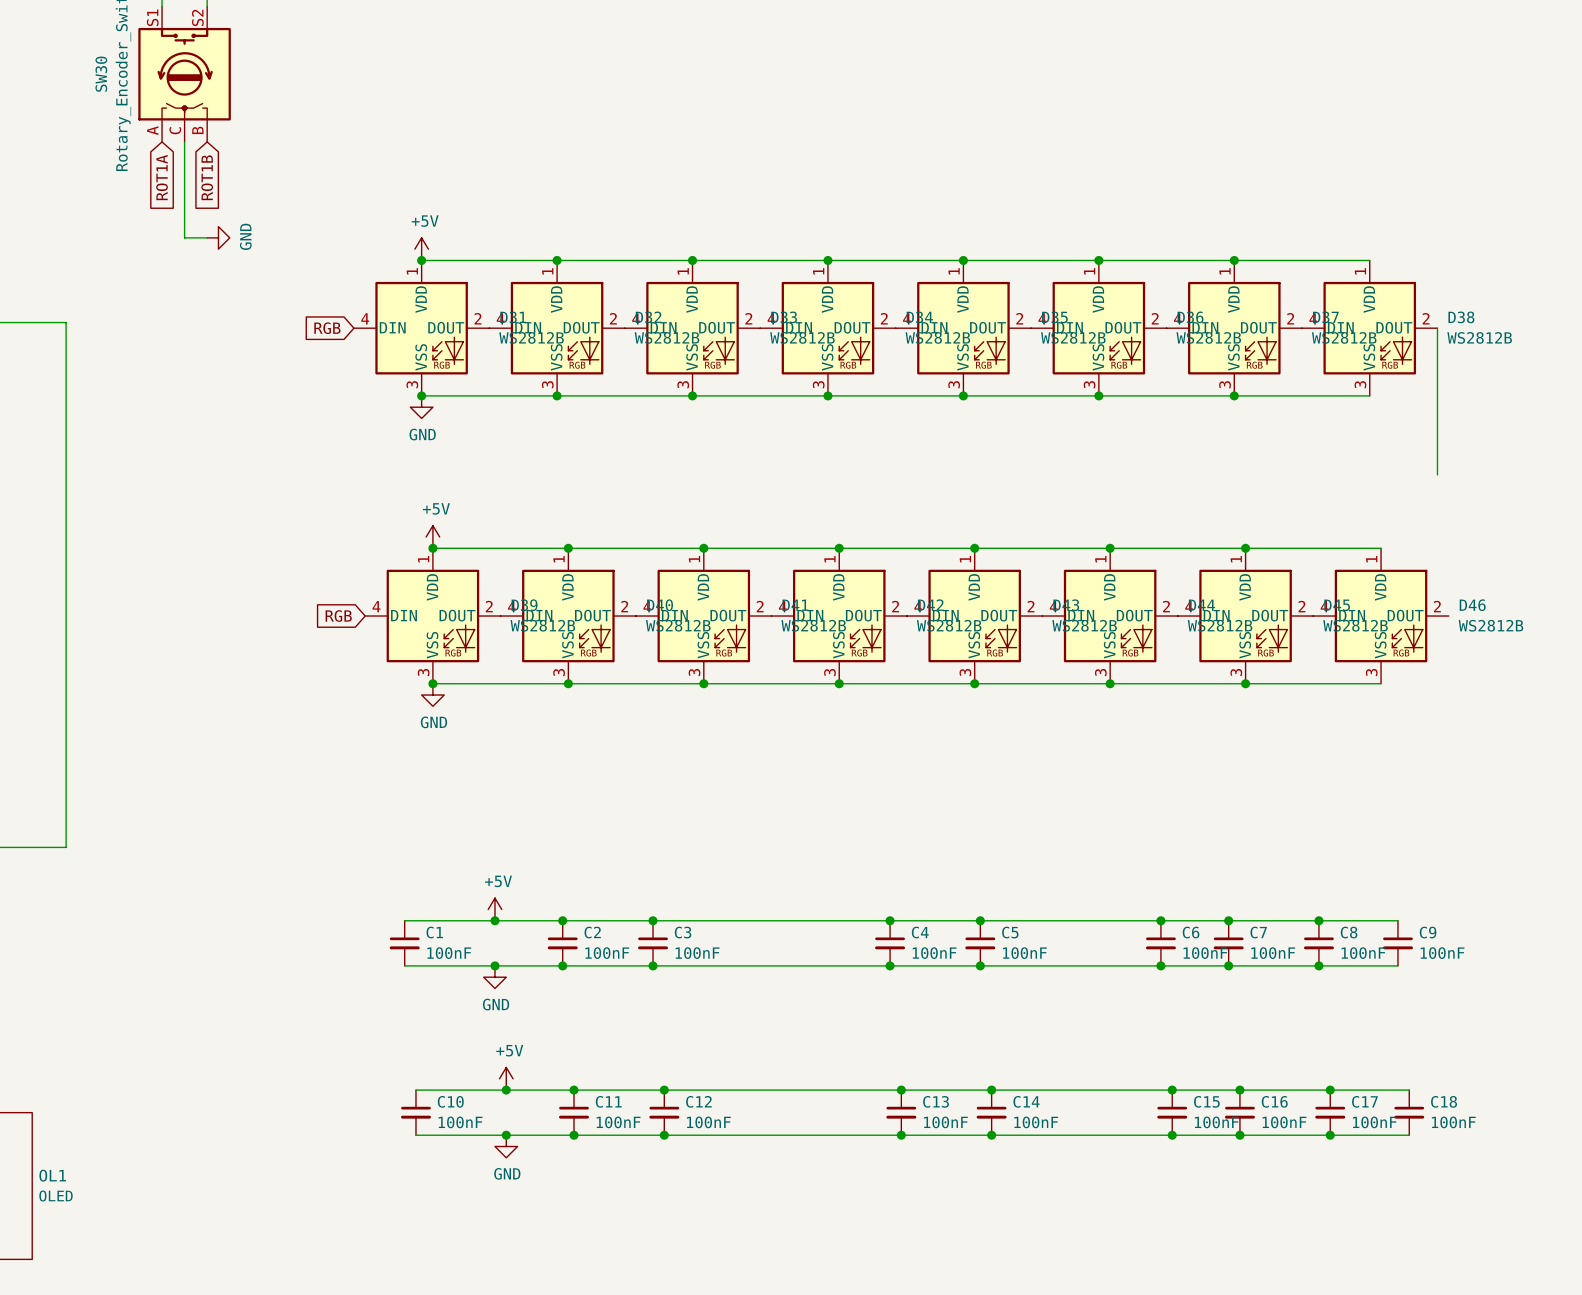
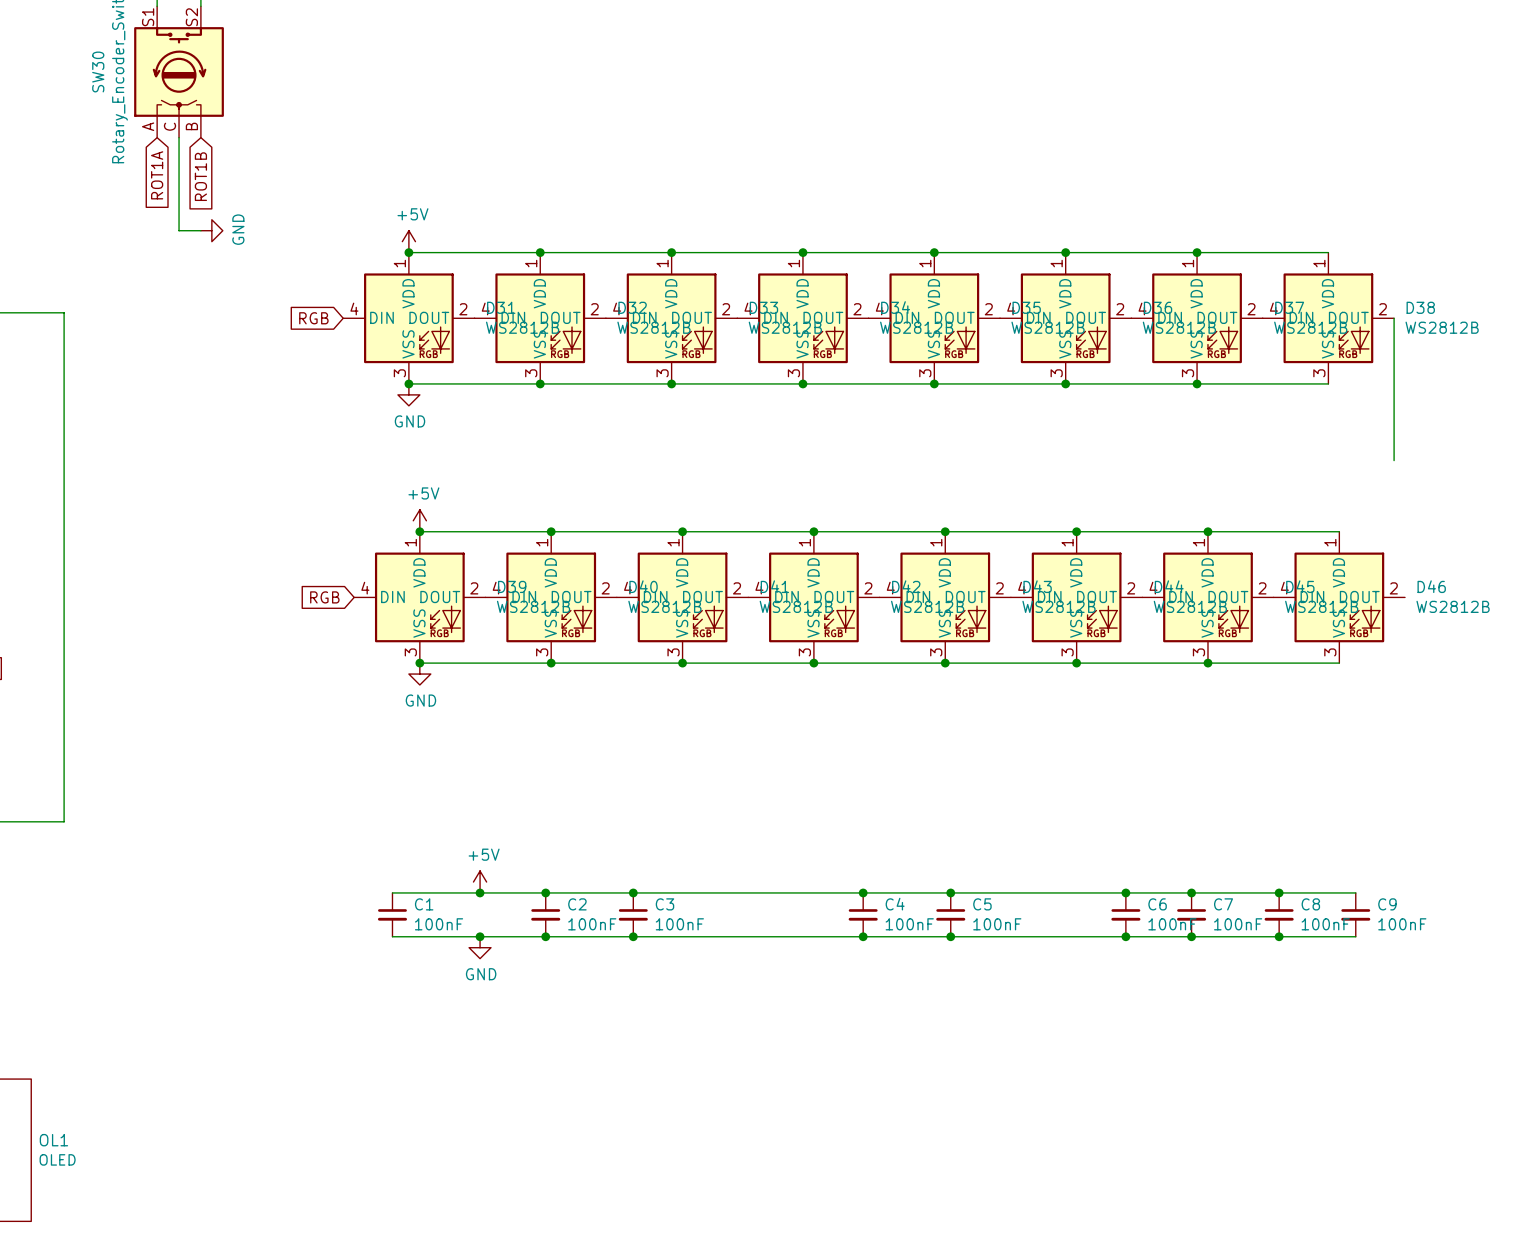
power symbol: +5V (506, 1078) -> none
wire: (415, 1090) (1409, 1090) -> none
junction: (506, 1090) -> none
junction: (574, 1090) -> none
junction: (664, 1090) -> none
junction: (901, 1090) -> none
junction: (991, 1090) -> none
junction: (1172, 1090) -> none
junction: (1239, 1090) -> none
junction: (1330, 1090) -> none
C10: 100nF (415, 1112) -> none
C11: 100nF (574, 1112) -> none
C12: 100nF (664, 1112) -> none
C13: 100nF (901, 1112) -> none
C14: 100nF (991, 1112) -> none
C15: 100nF (1172, 1112) -> none
C16: 100nF (1239, 1112) -> none
C17: 100nF (1330, 1112) -> none
C18: 100nF (1409, 1112) -> none
wire: (415, 1135) (1409, 1135) -> none
junction: (506, 1135) -> none
junction: (574, 1135) -> none
junction: (664, 1135) -> none
junction: (901, 1135) -> none
junction: (991, 1135) -> none
junction: (1172, 1135) -> none
junction: (1239, 1135) -> none
junction: (1330, 1135) -> none
power symbol: GND (506, 1146) -> none

